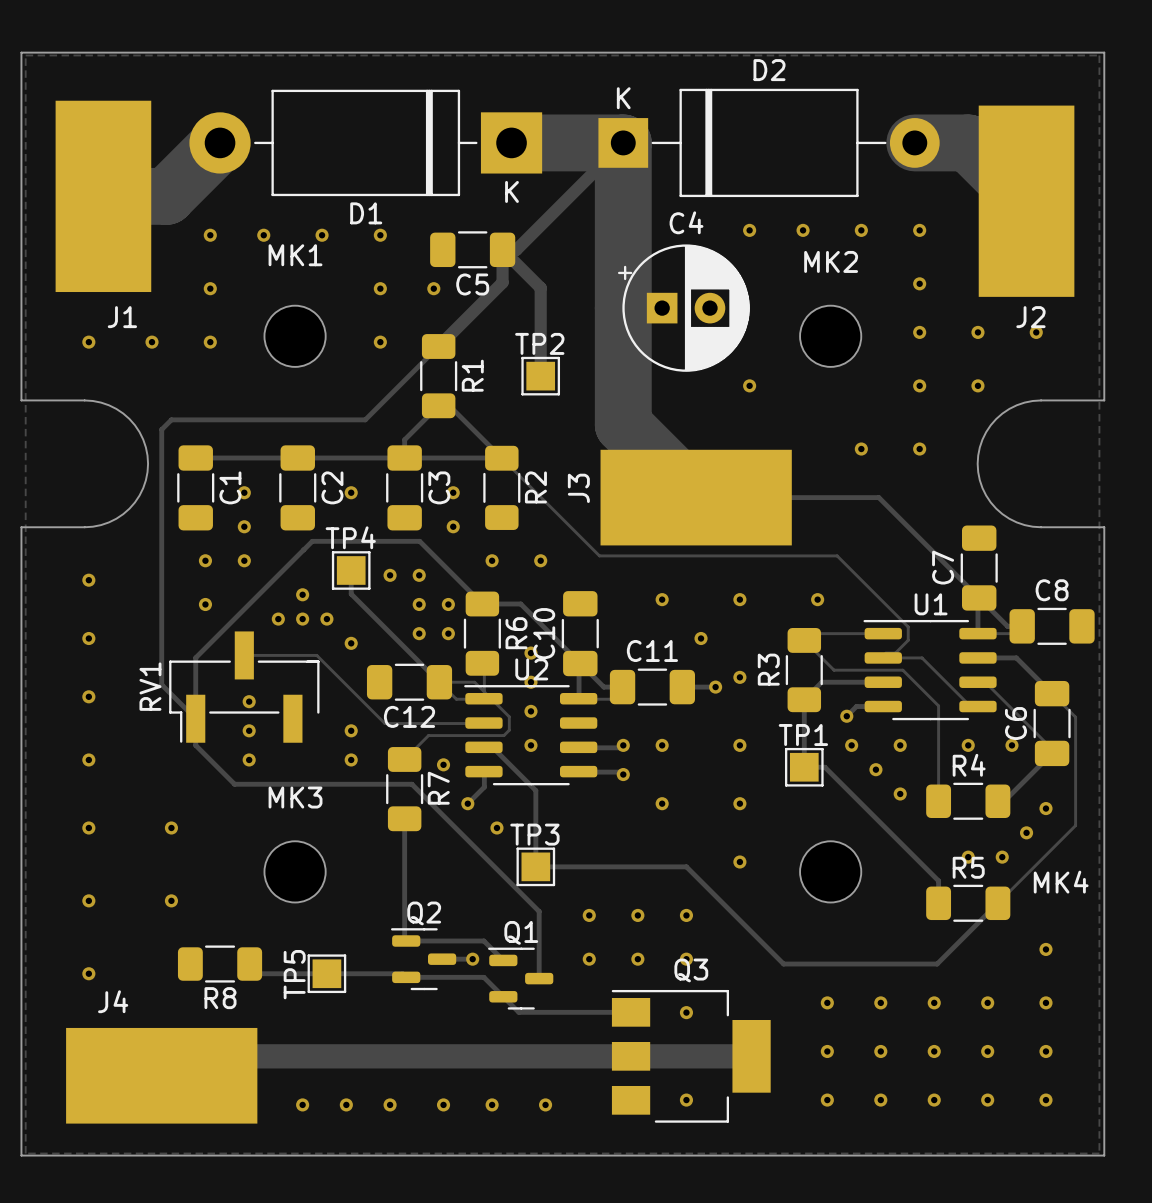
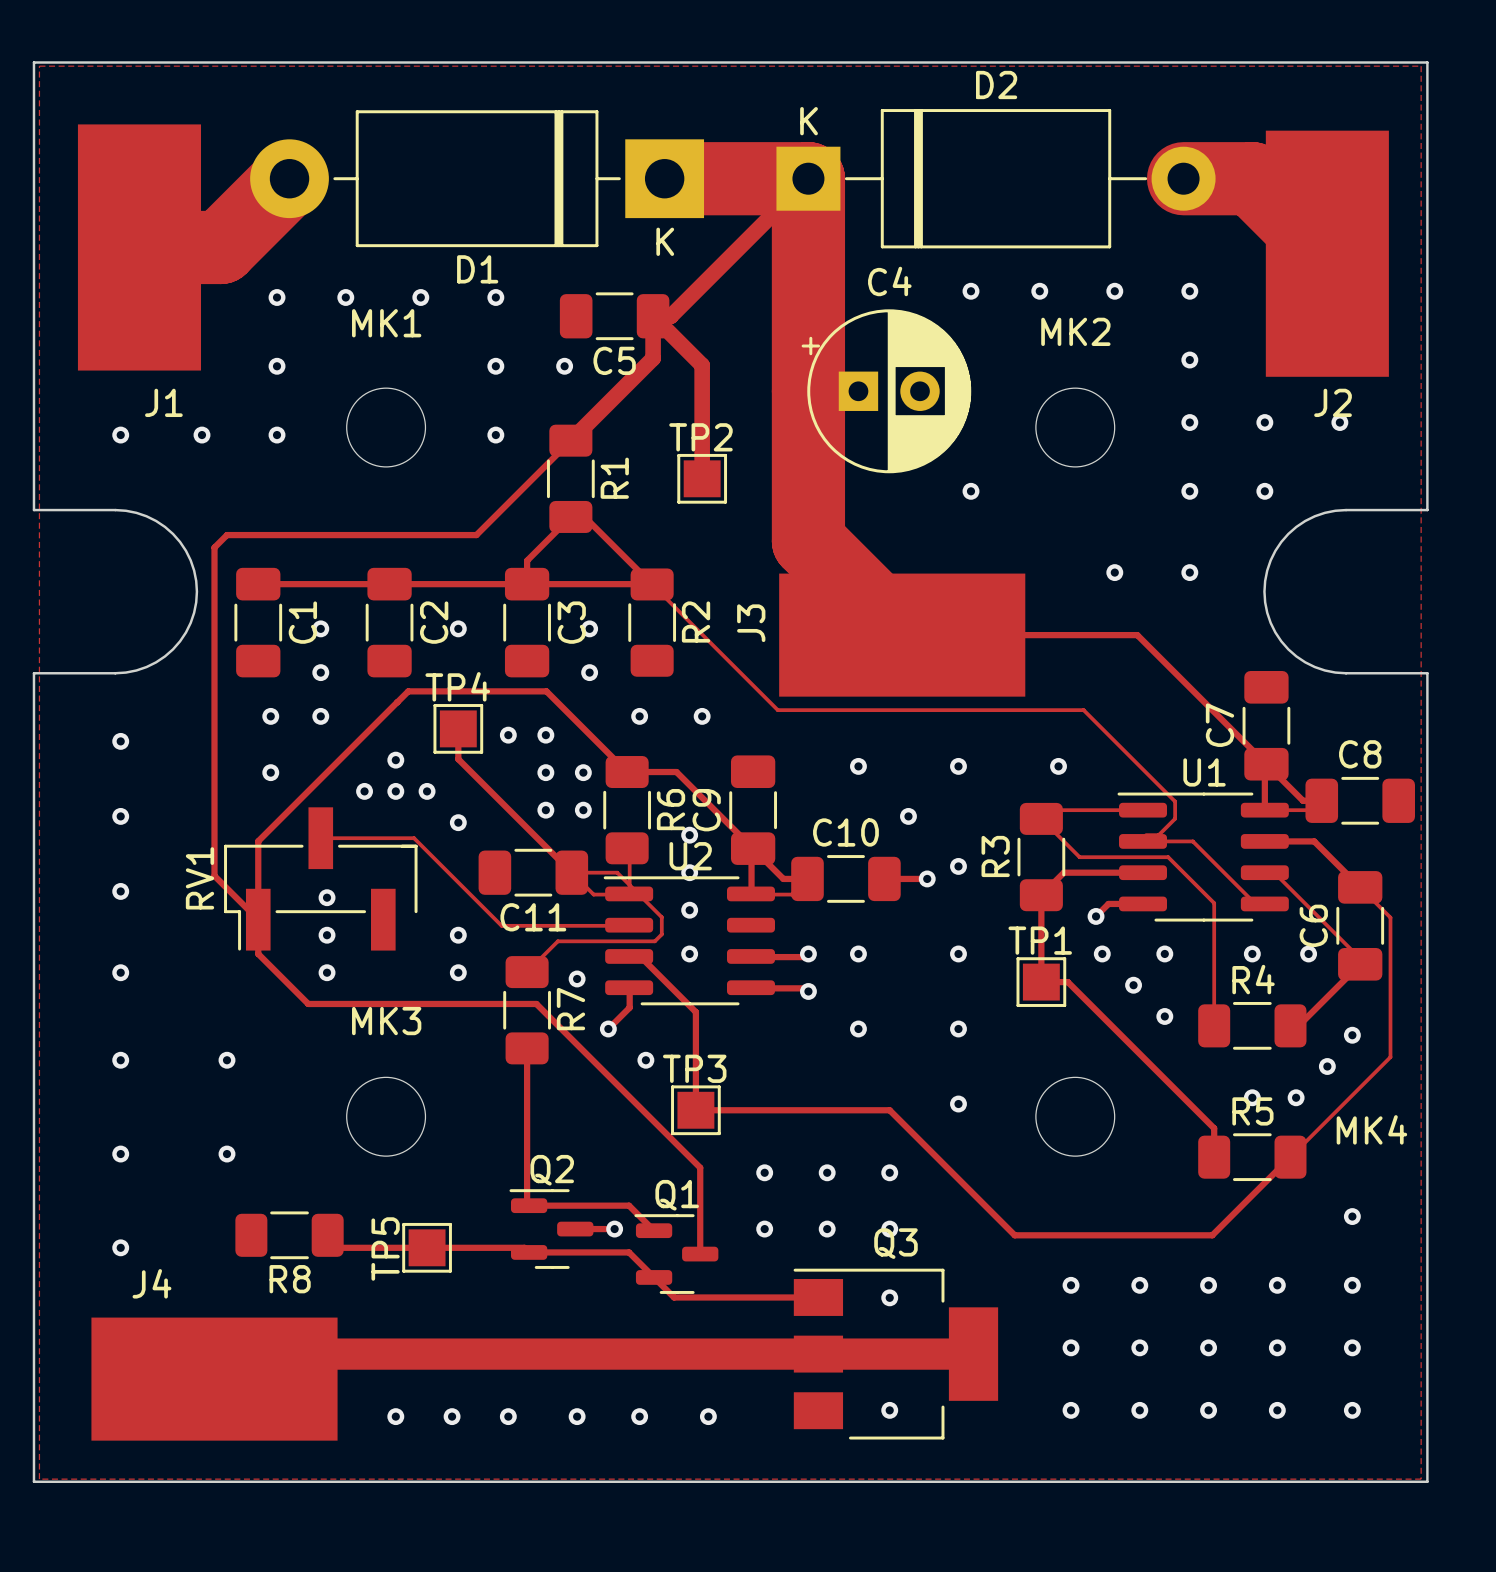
C10 name: C10 (544, 633) -> C9 (706, 810)
C11 name: C11 (652, 650) -> C10 (845, 832)
C12 name: C12 (409, 716) -> C11 (533, 917)

